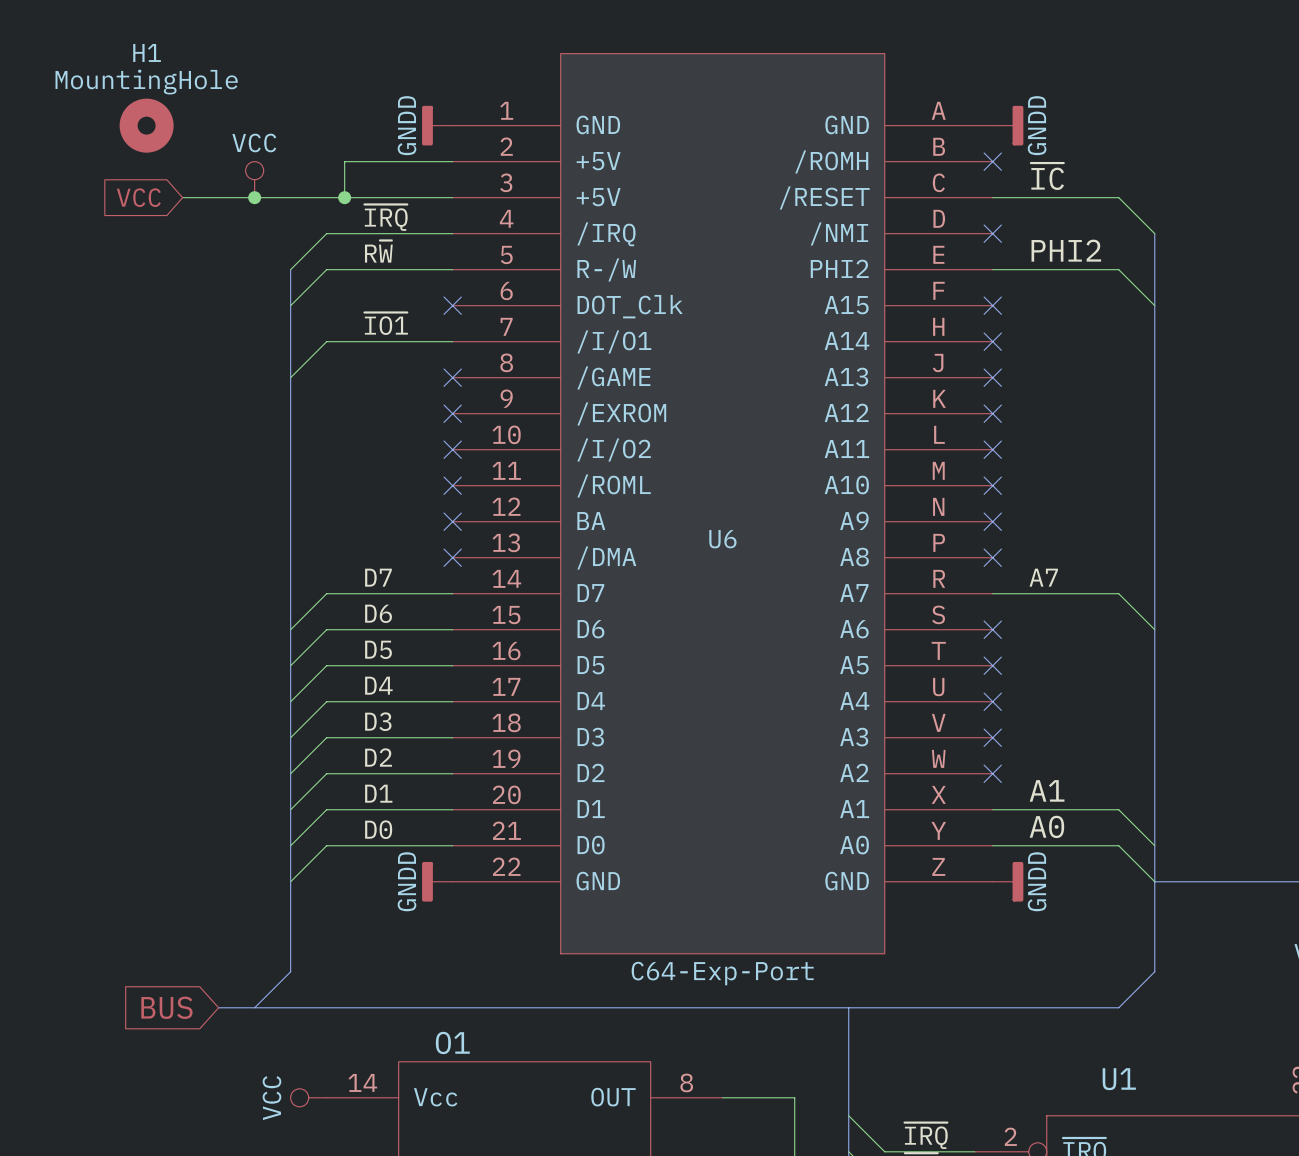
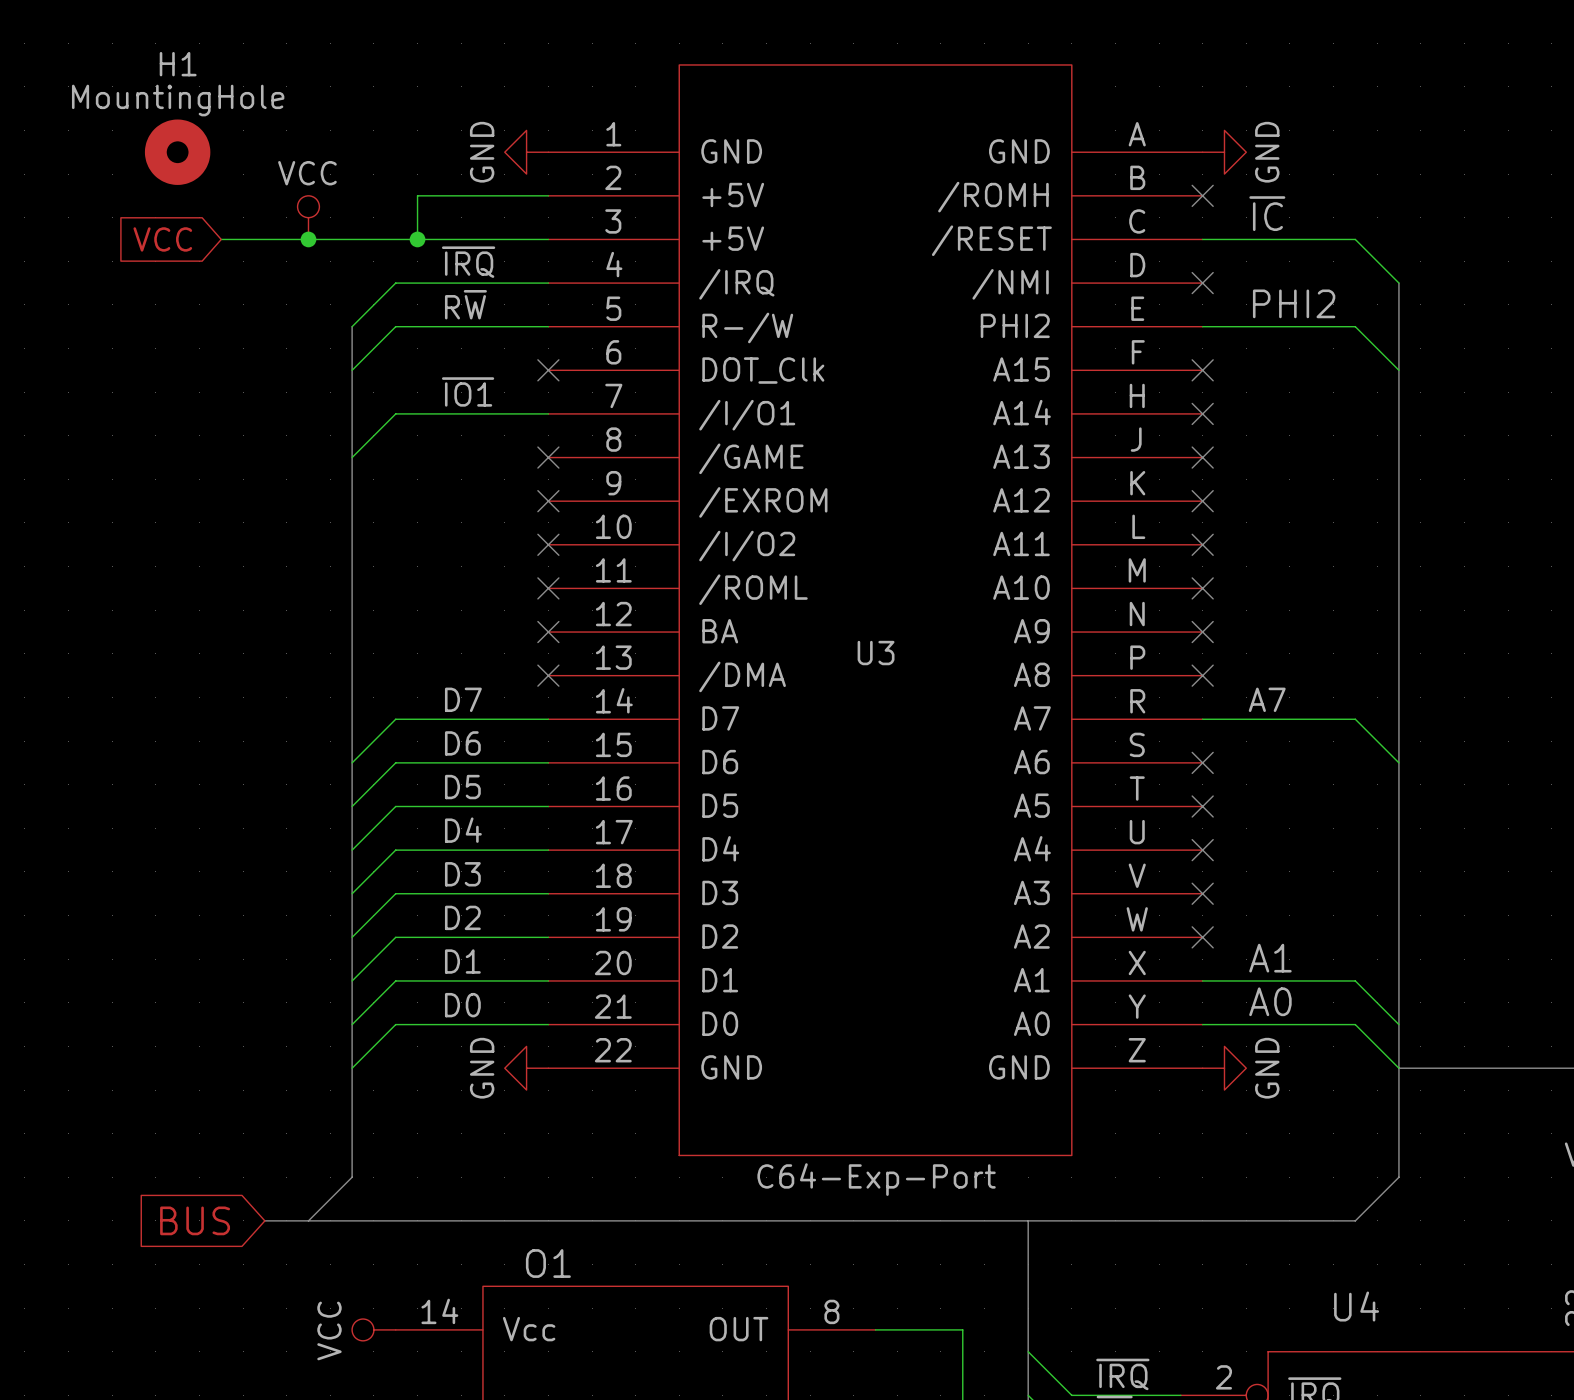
power symbol: GNDD (437, 125) -> GND (526, 152)
power symbol: GNDD (1008, 125) -> GND (1224, 152)
U6 name: U6 (722, 539) -> U3 (876, 653)
power symbol: GNDD (437, 881) -> GND (526, 1068)
power symbol: GNDD (1008, 881) -> GND (1224, 1068)
U1 name: U1 (1119, 1079) -> U4 (1356, 1306)

